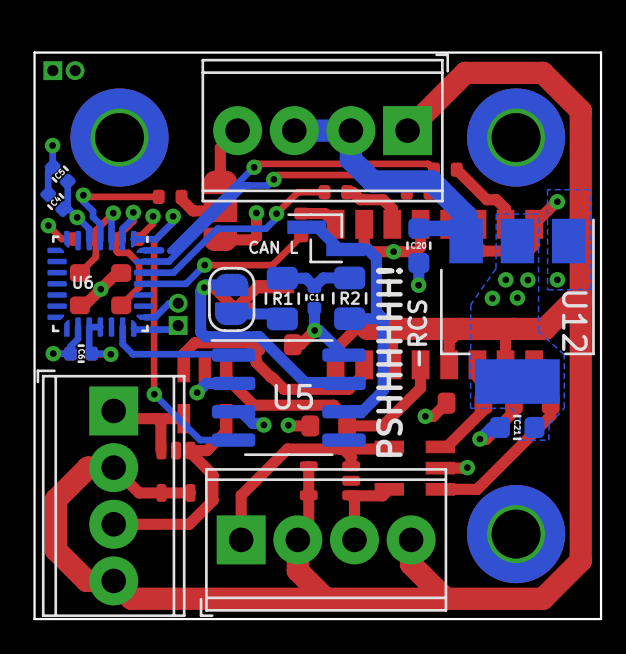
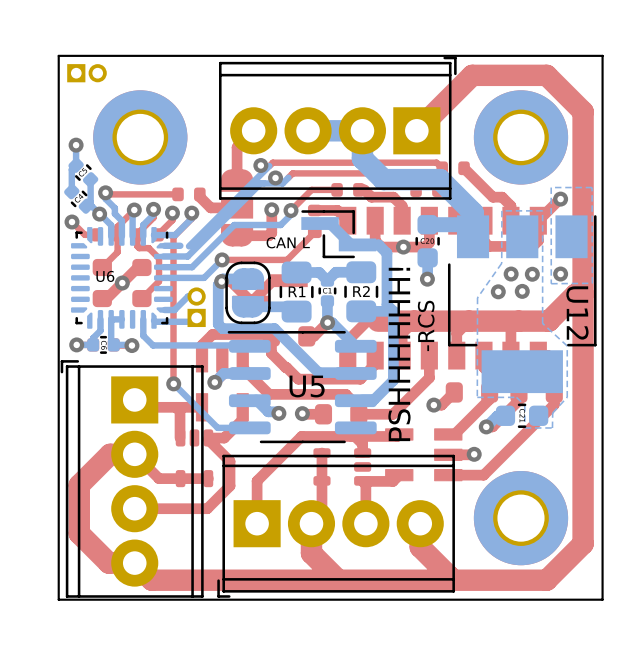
via: none -> (260, 165)
via: (254, 167) -> none
via: none -> (275, 177)
via: (273, 179) -> none

